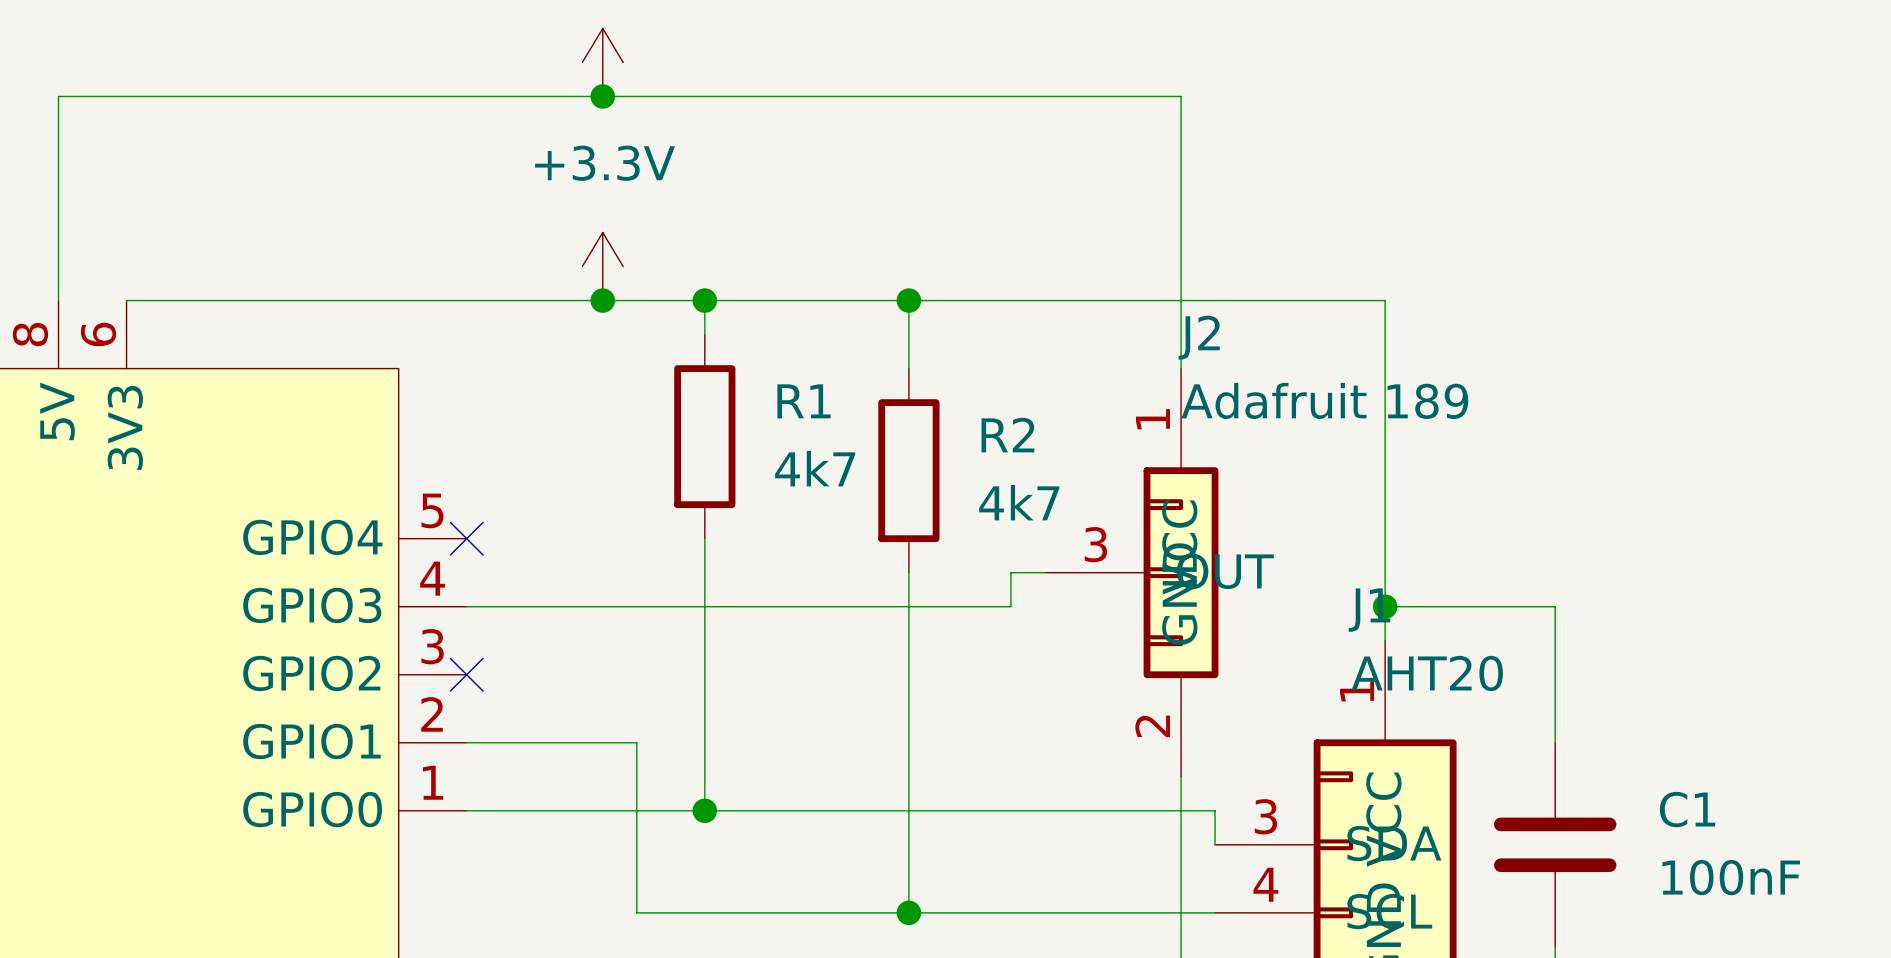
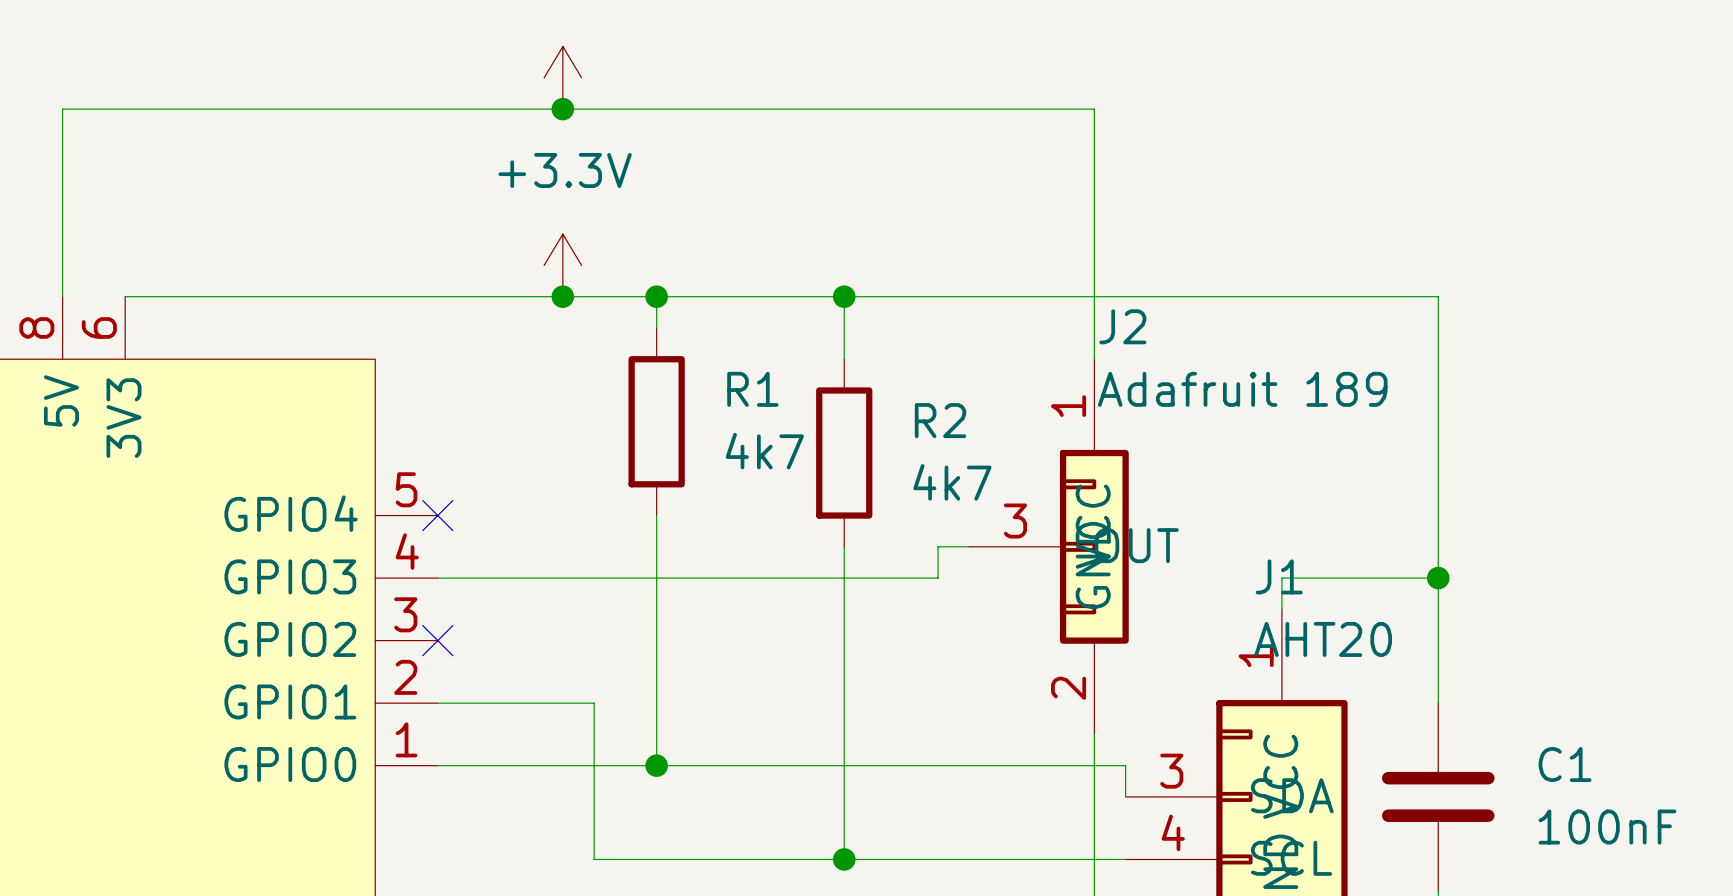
wire: (1385, 300) (1385, 606) -> (1281, 296) (1438, 296) (1438, 578)
junction: (1385, 606) -> none
junction: none -> (1438, 578)

